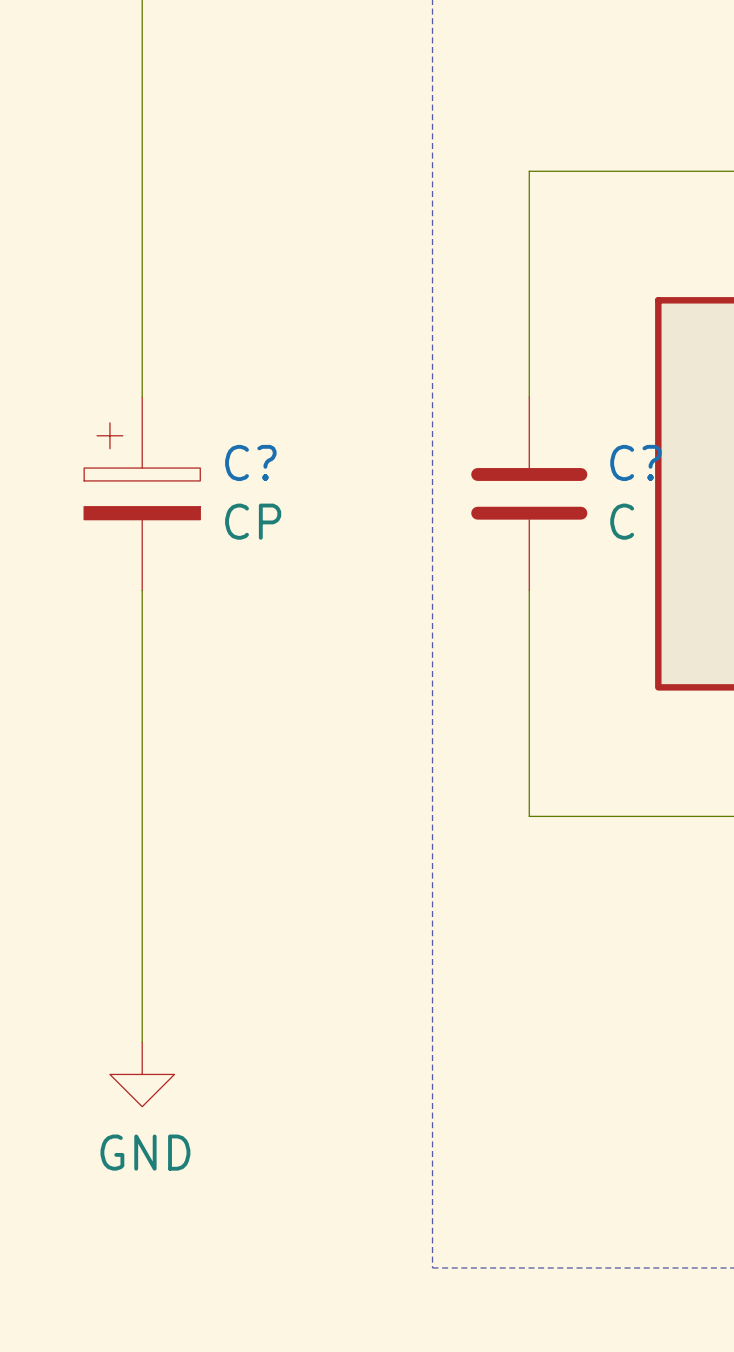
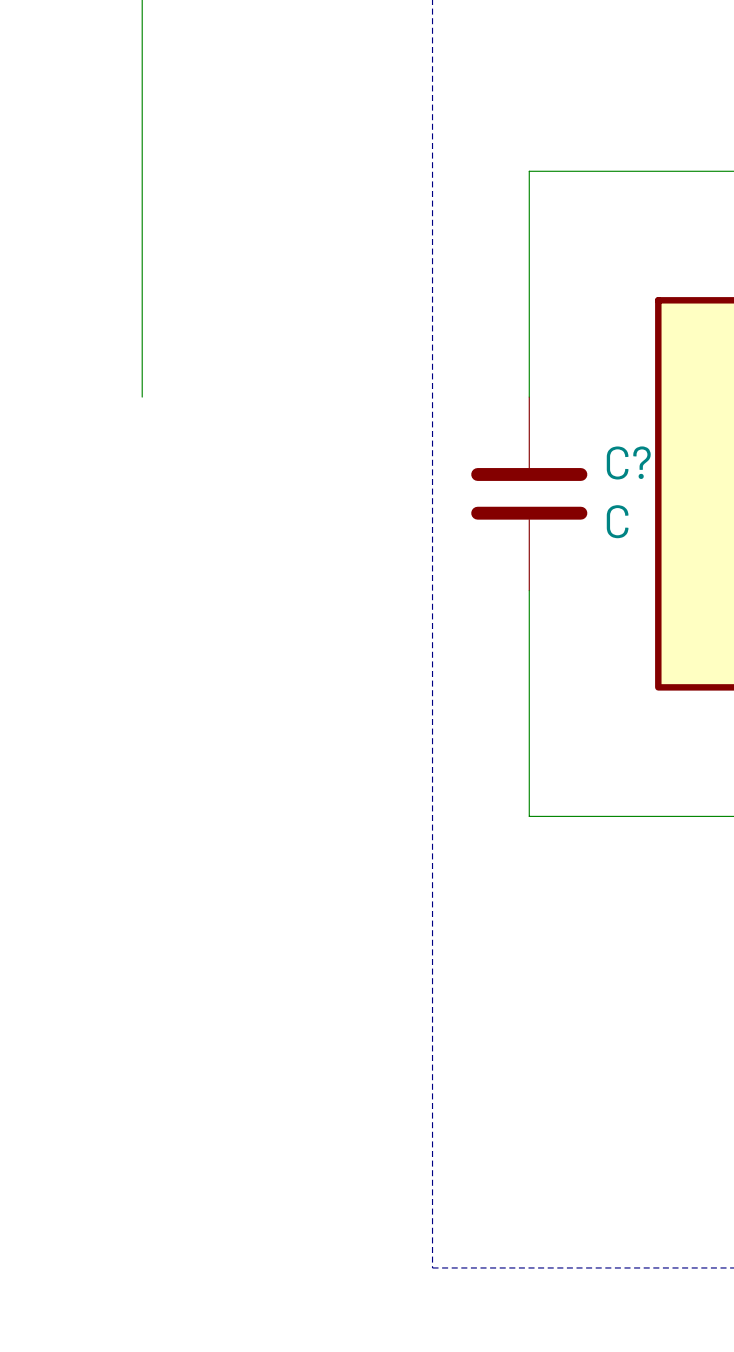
C?: CP (142, 493) -> none
wire: (142, 590) (142, 1042) -> none
power symbol: GND (142, 1074) -> none

